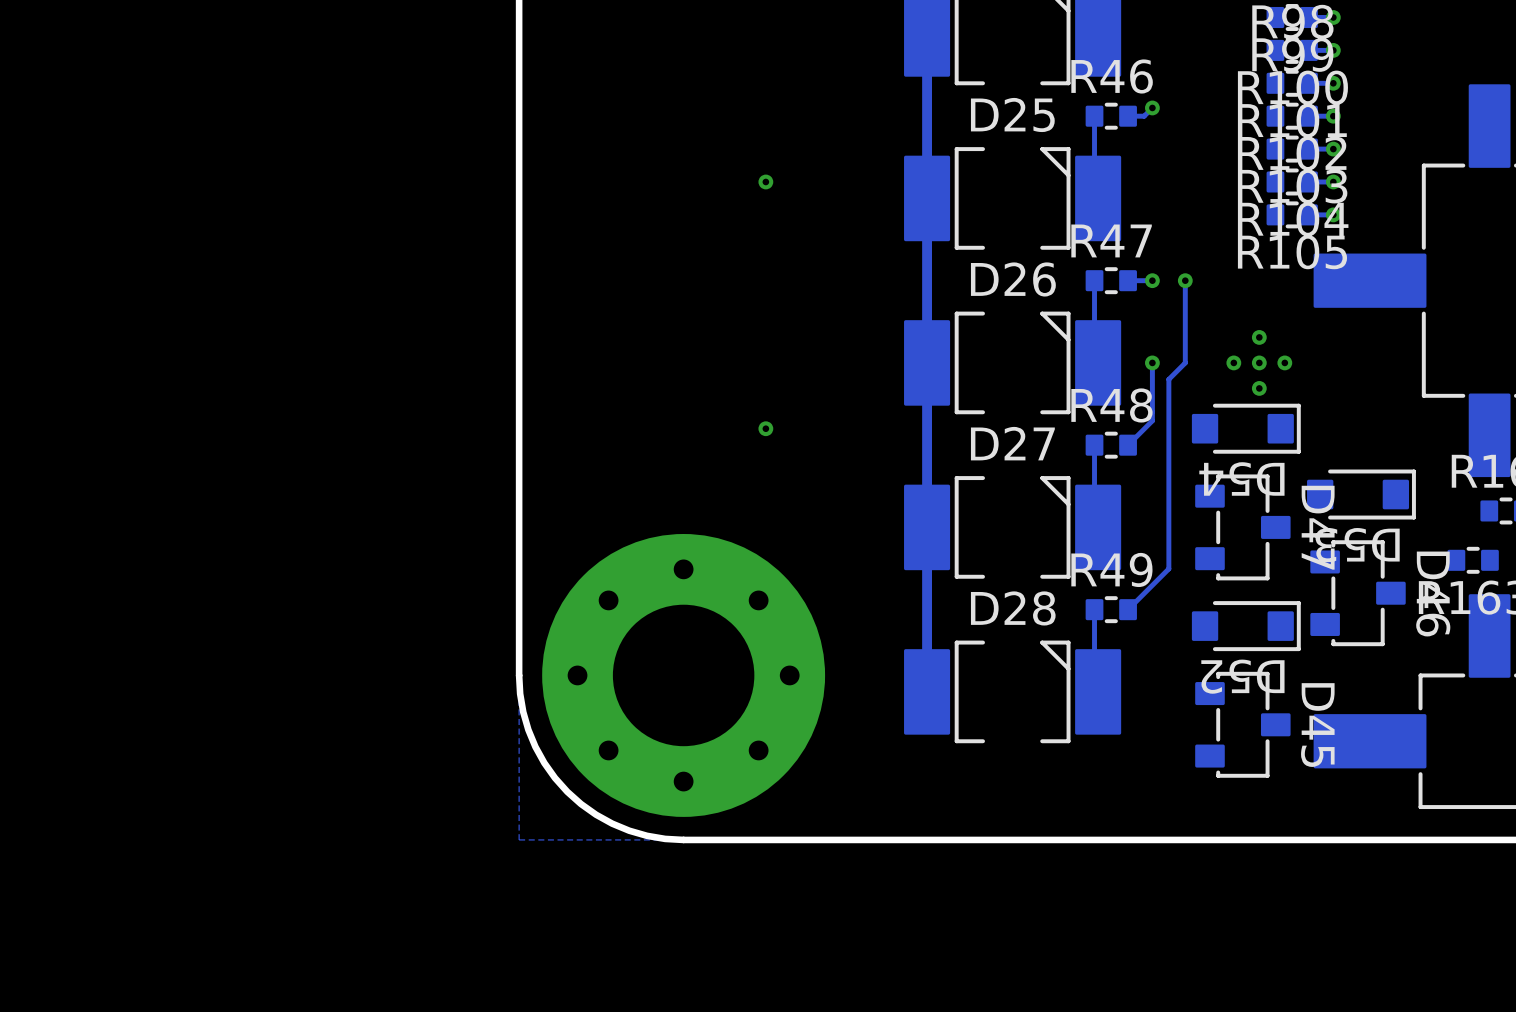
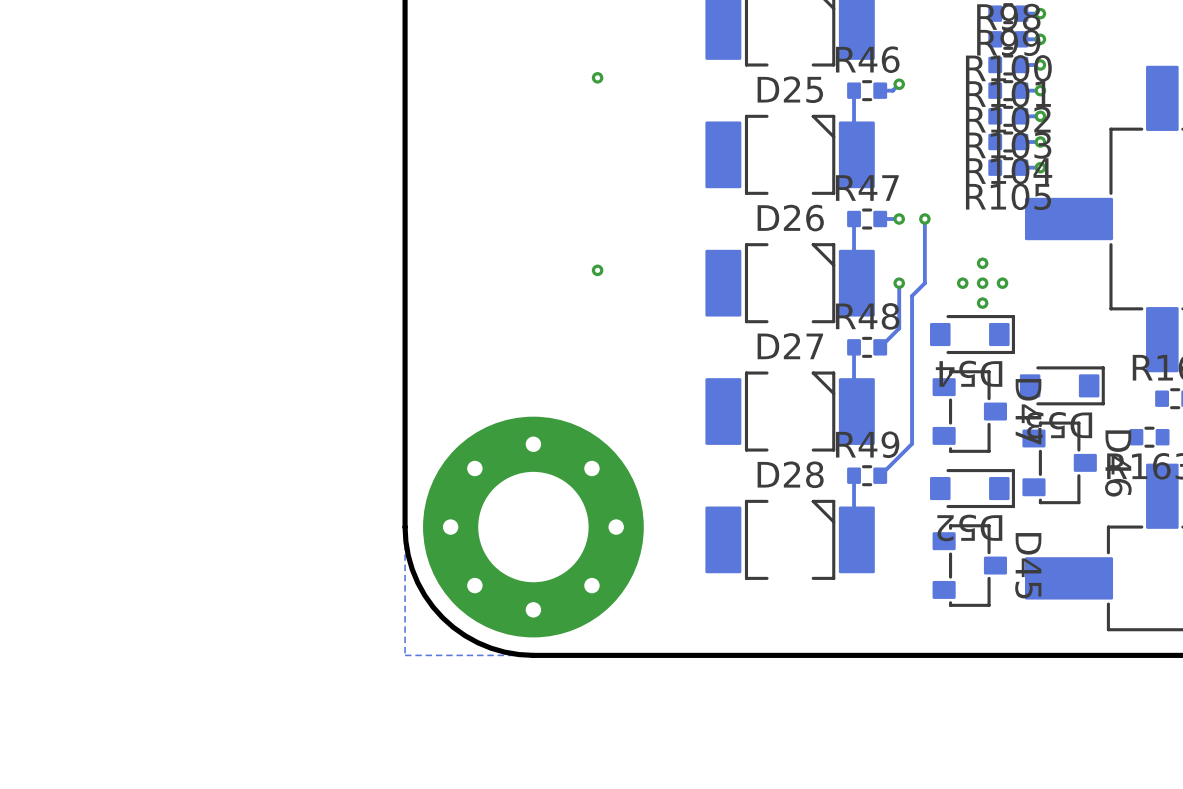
track: (927, 33) (927, 691) -> none
part: none -> (597, 77)
part: (765, 181) -> none
part: none -> (597, 270)
part: (765, 428) -> none

